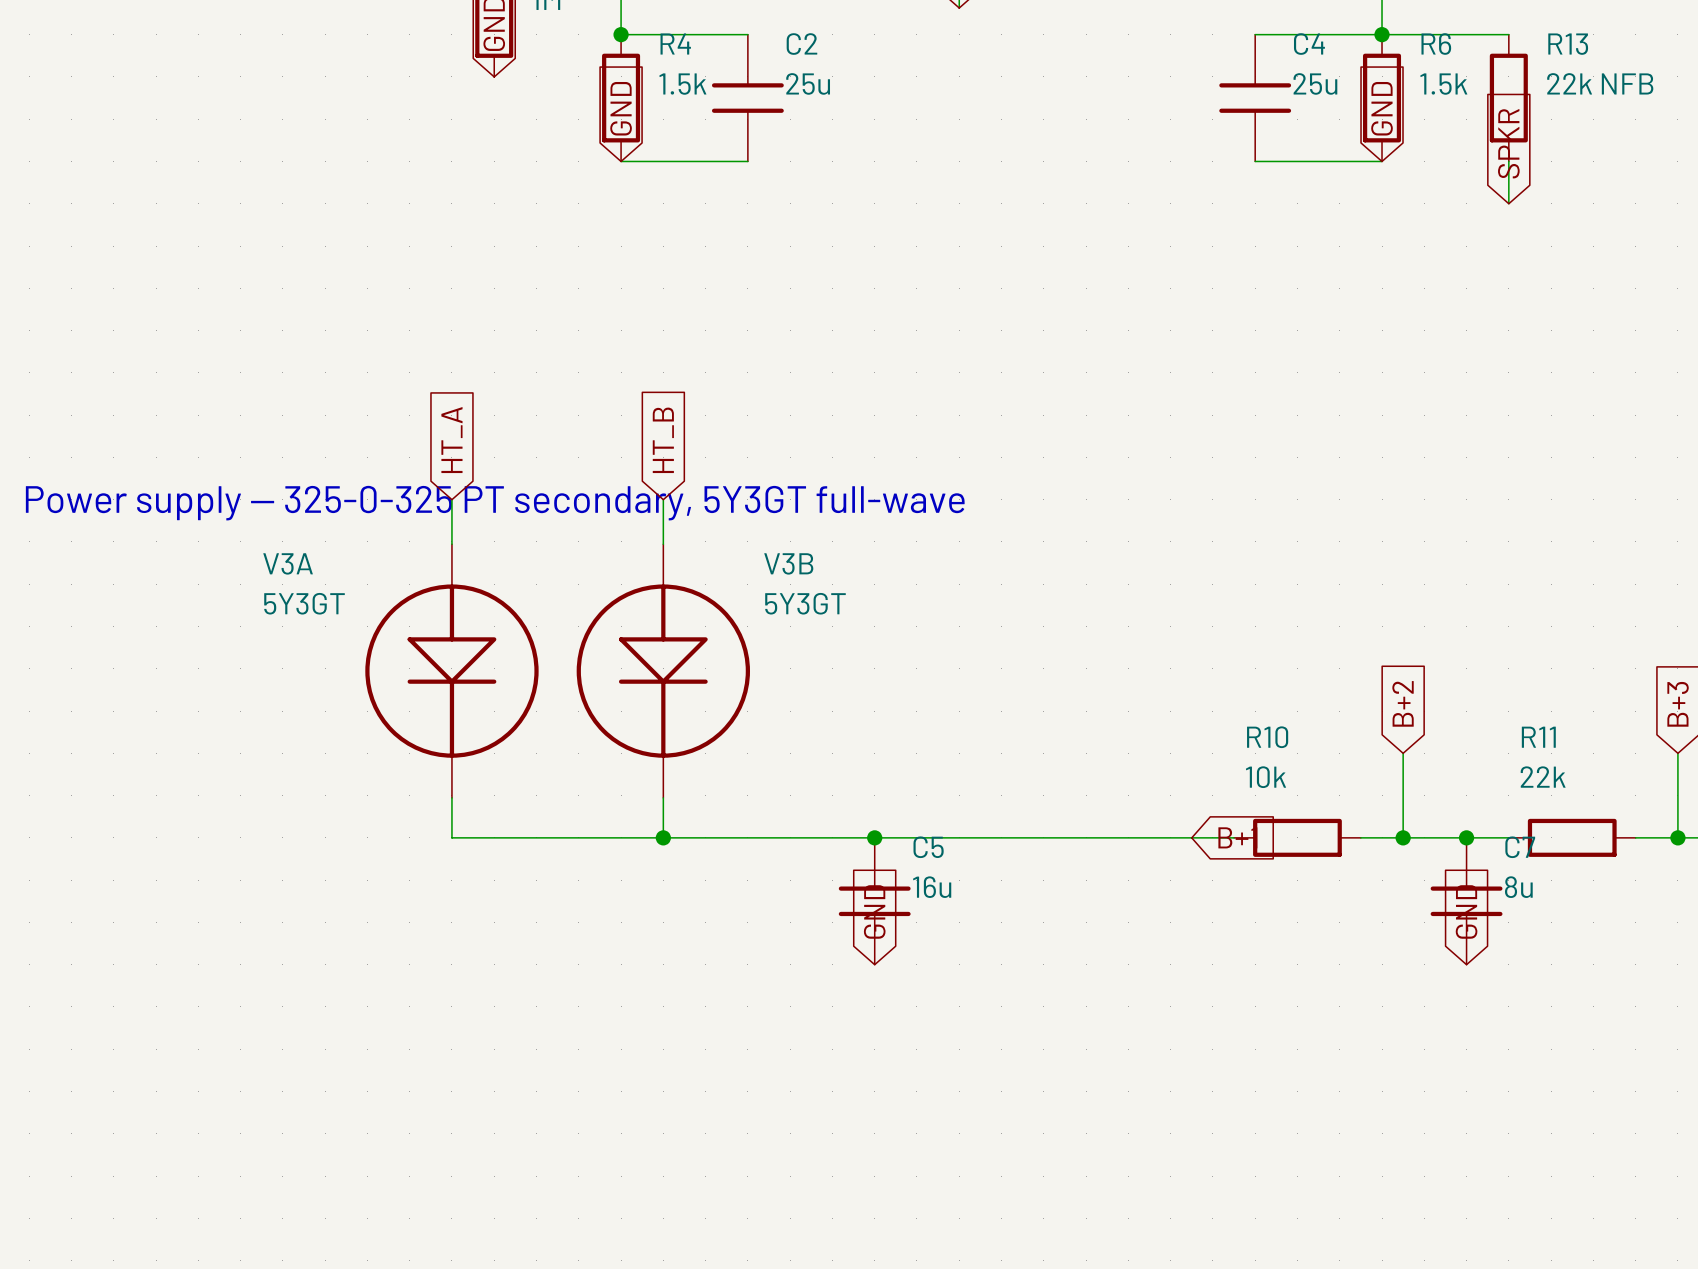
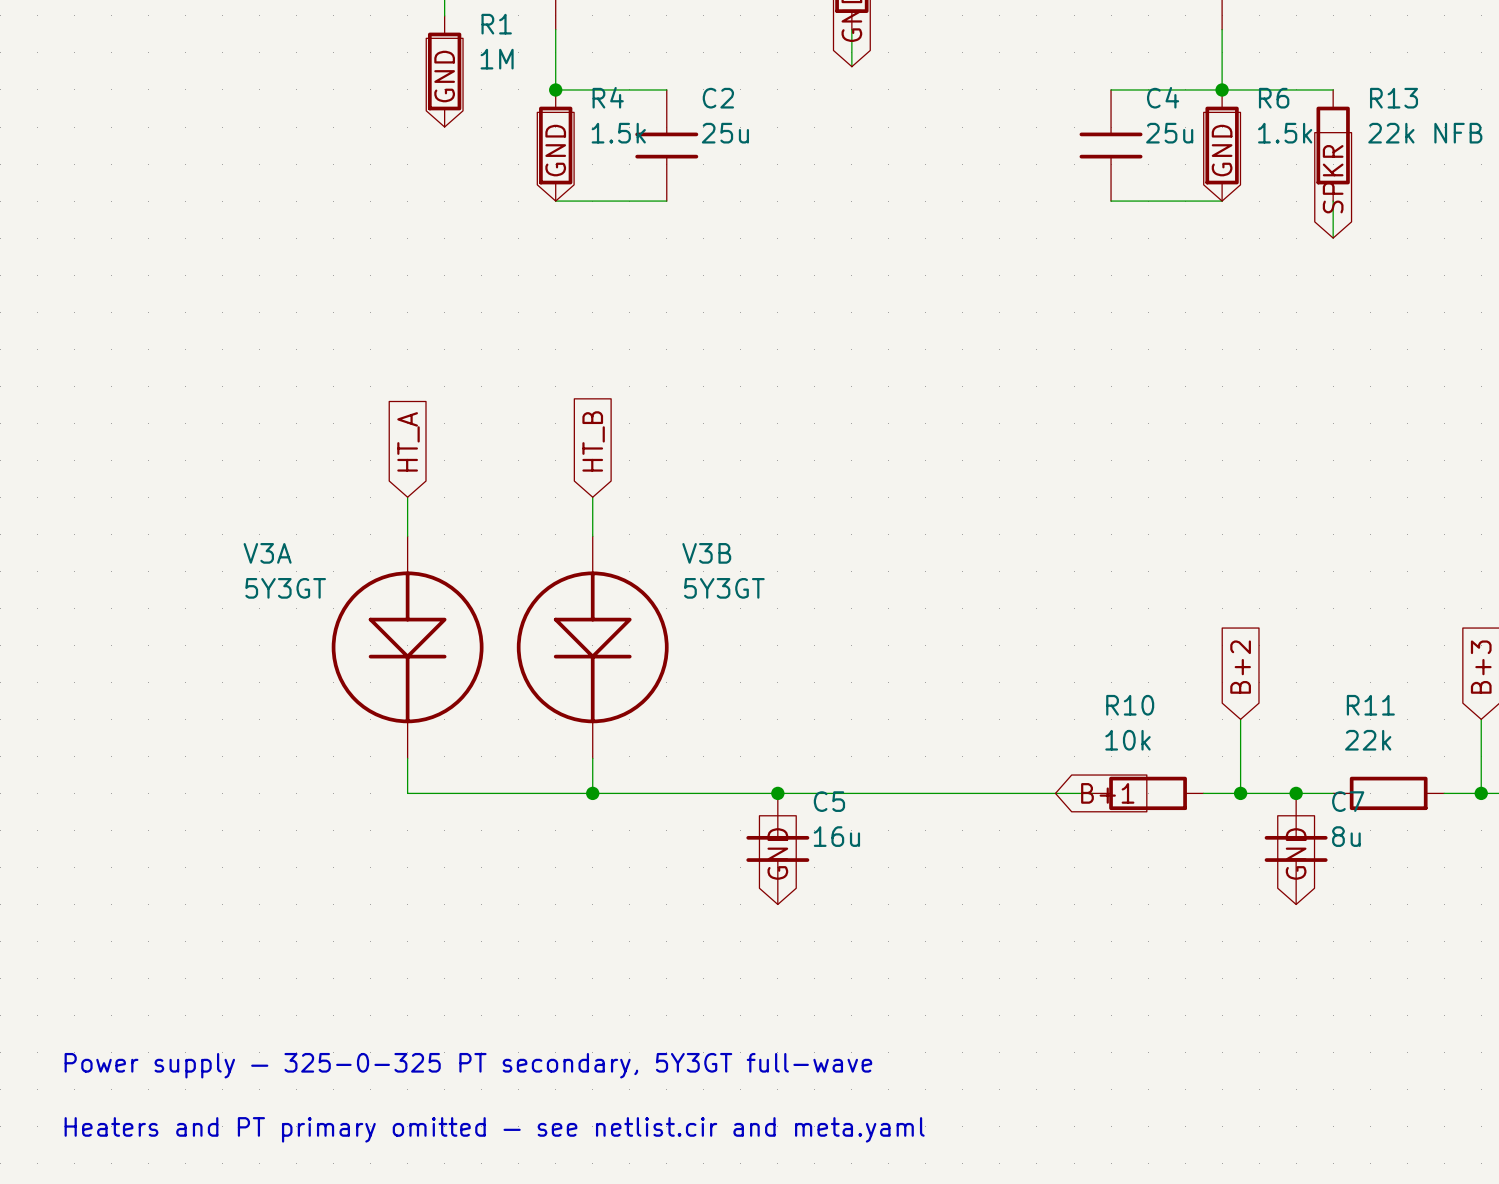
text: Power supply — 325-0-325 PT secondary, 5Y3GT full-wave (495, 503) -> none
text: none -> Power supply — 325-0-325 PT secondary, 5Y3GT full-wave (468, 1065)
text: none -> Heaters and PT primary omitted — see netlist.cir and meta.yaml (494, 1129)

